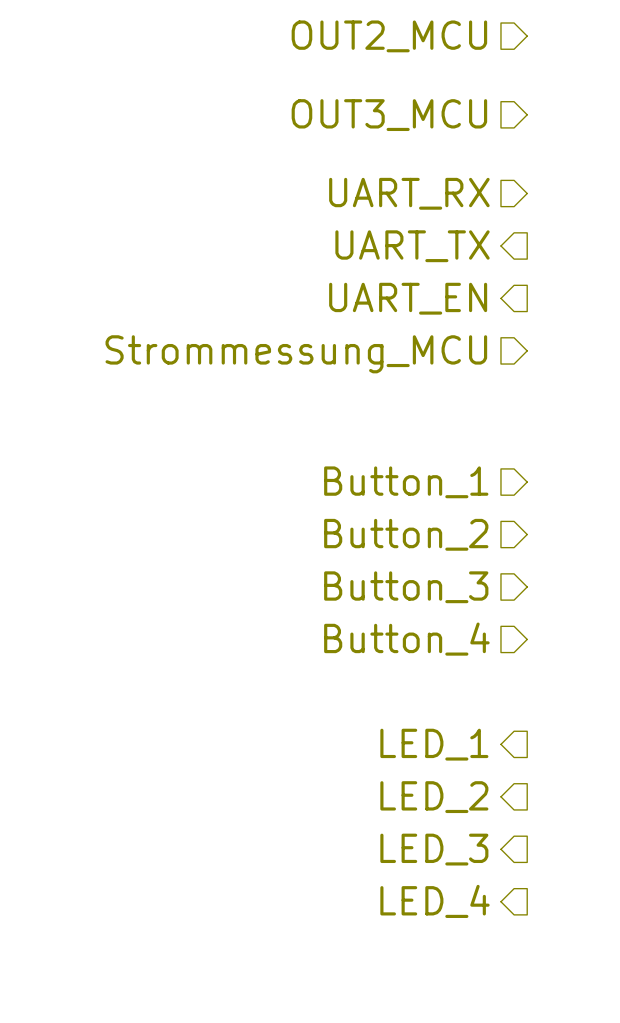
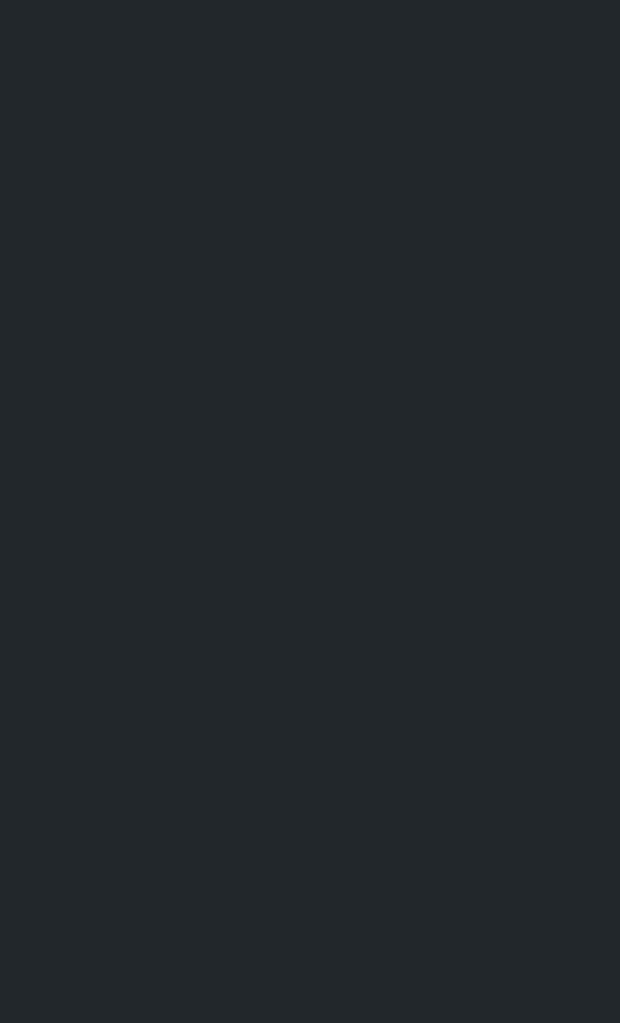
hierarchical label: OUT2_MCU (389, 36) -> none
hierarchical label: OUT3_MCU (389, 115) -> none
hierarchical label: UART_RX (409, 193) -> none
hierarchical label: UART_TX (412, 246) -> none
hierarchical label: UART_EN (408, 298) -> none
hierarchical label: Strommessung_MCU (296, 354) -> none
hierarchical label: Button_1 (406, 482) -> none
hierarchical label: Button_2 (406, 534) -> none
hierarchical label: Button_3 (406, 587) -> none
hierarchical label: Button_4 (406, 639) -> none
hierarchical label: LED_1 (434, 744) -> none
hierarchical label: LED_2 (434, 797) -> none
hierarchical label: LED_3 (434, 849) -> none
hierarchical label: LED_4 (434, 901) -> none

